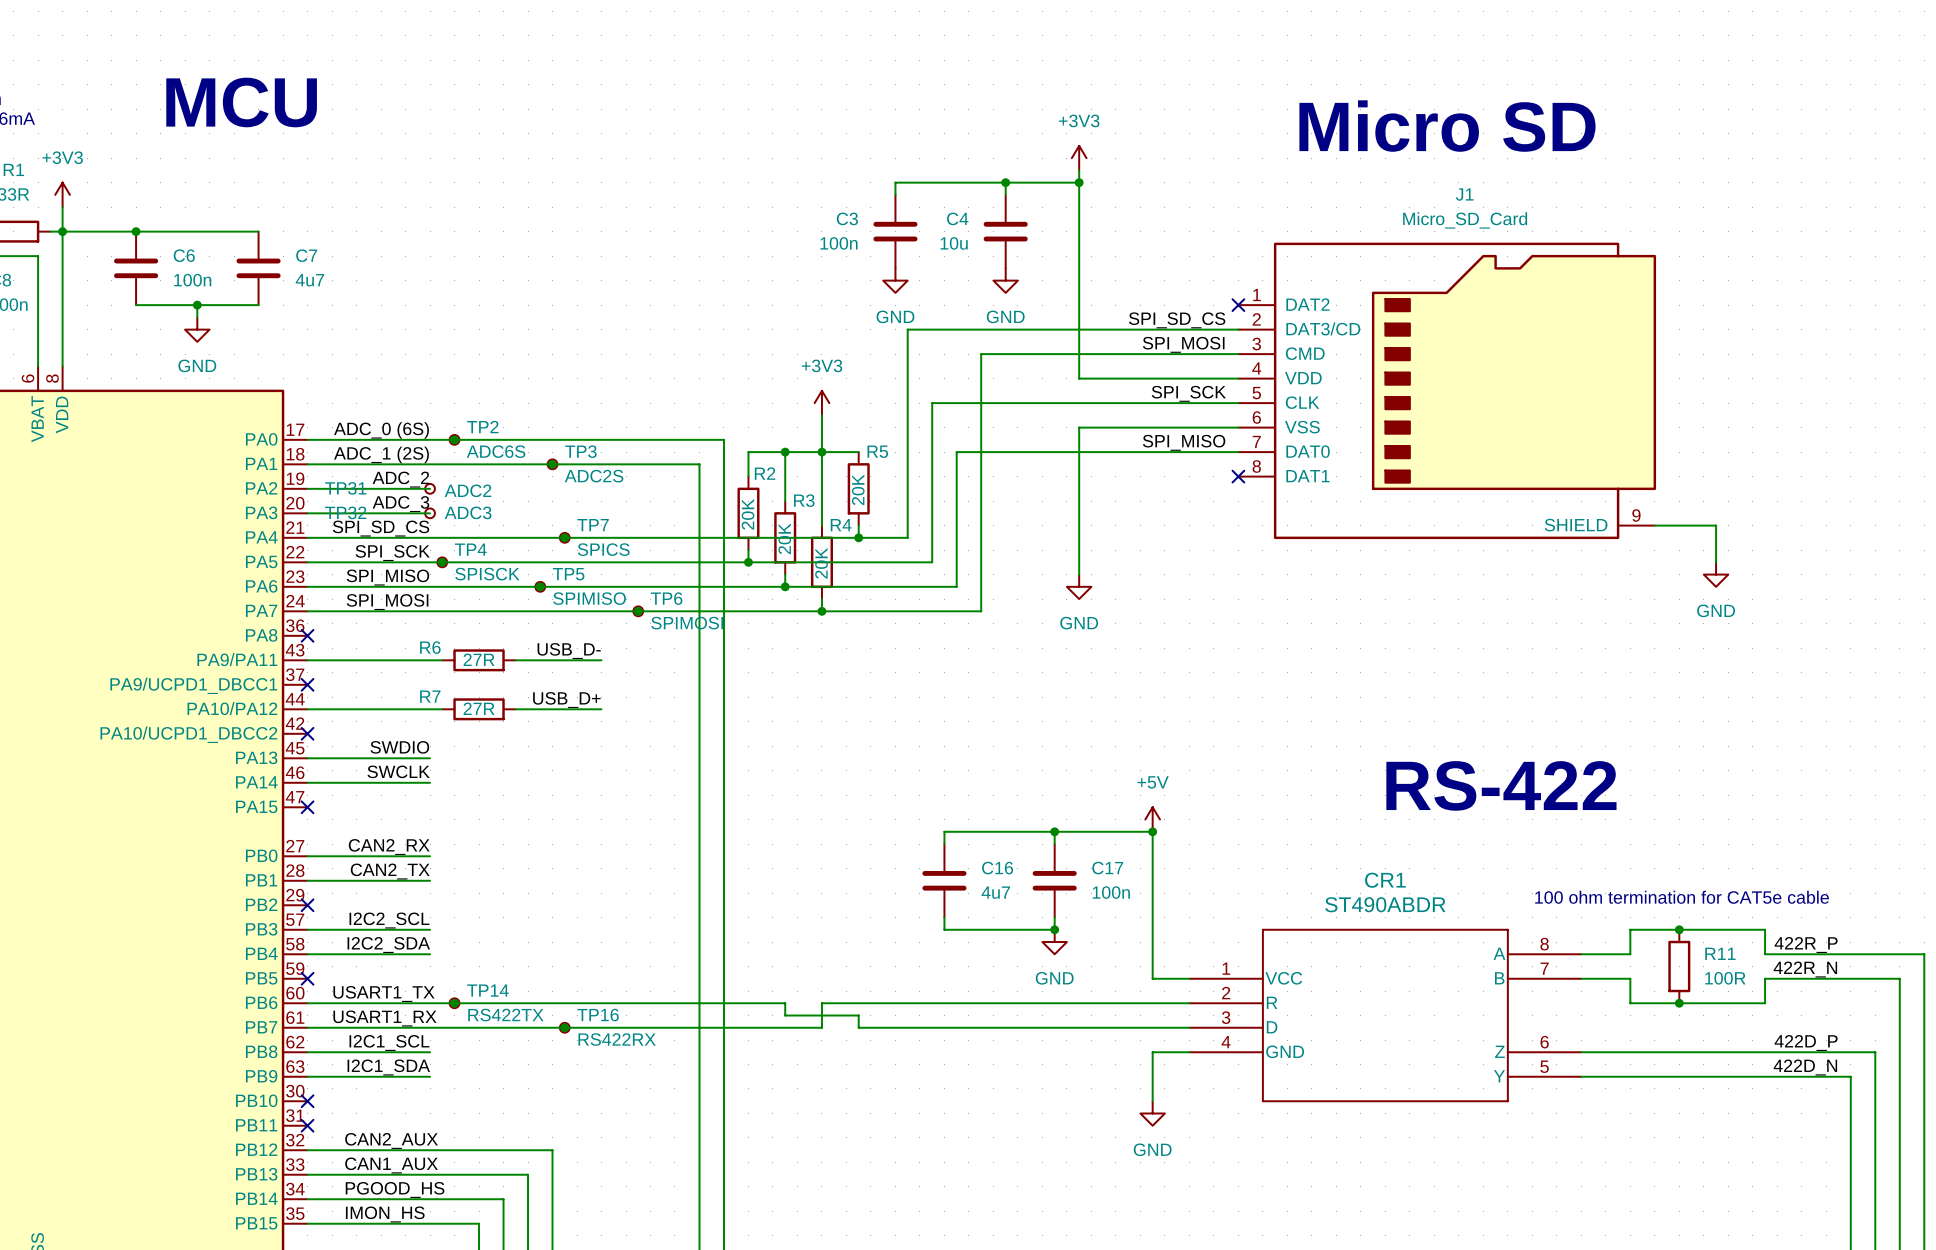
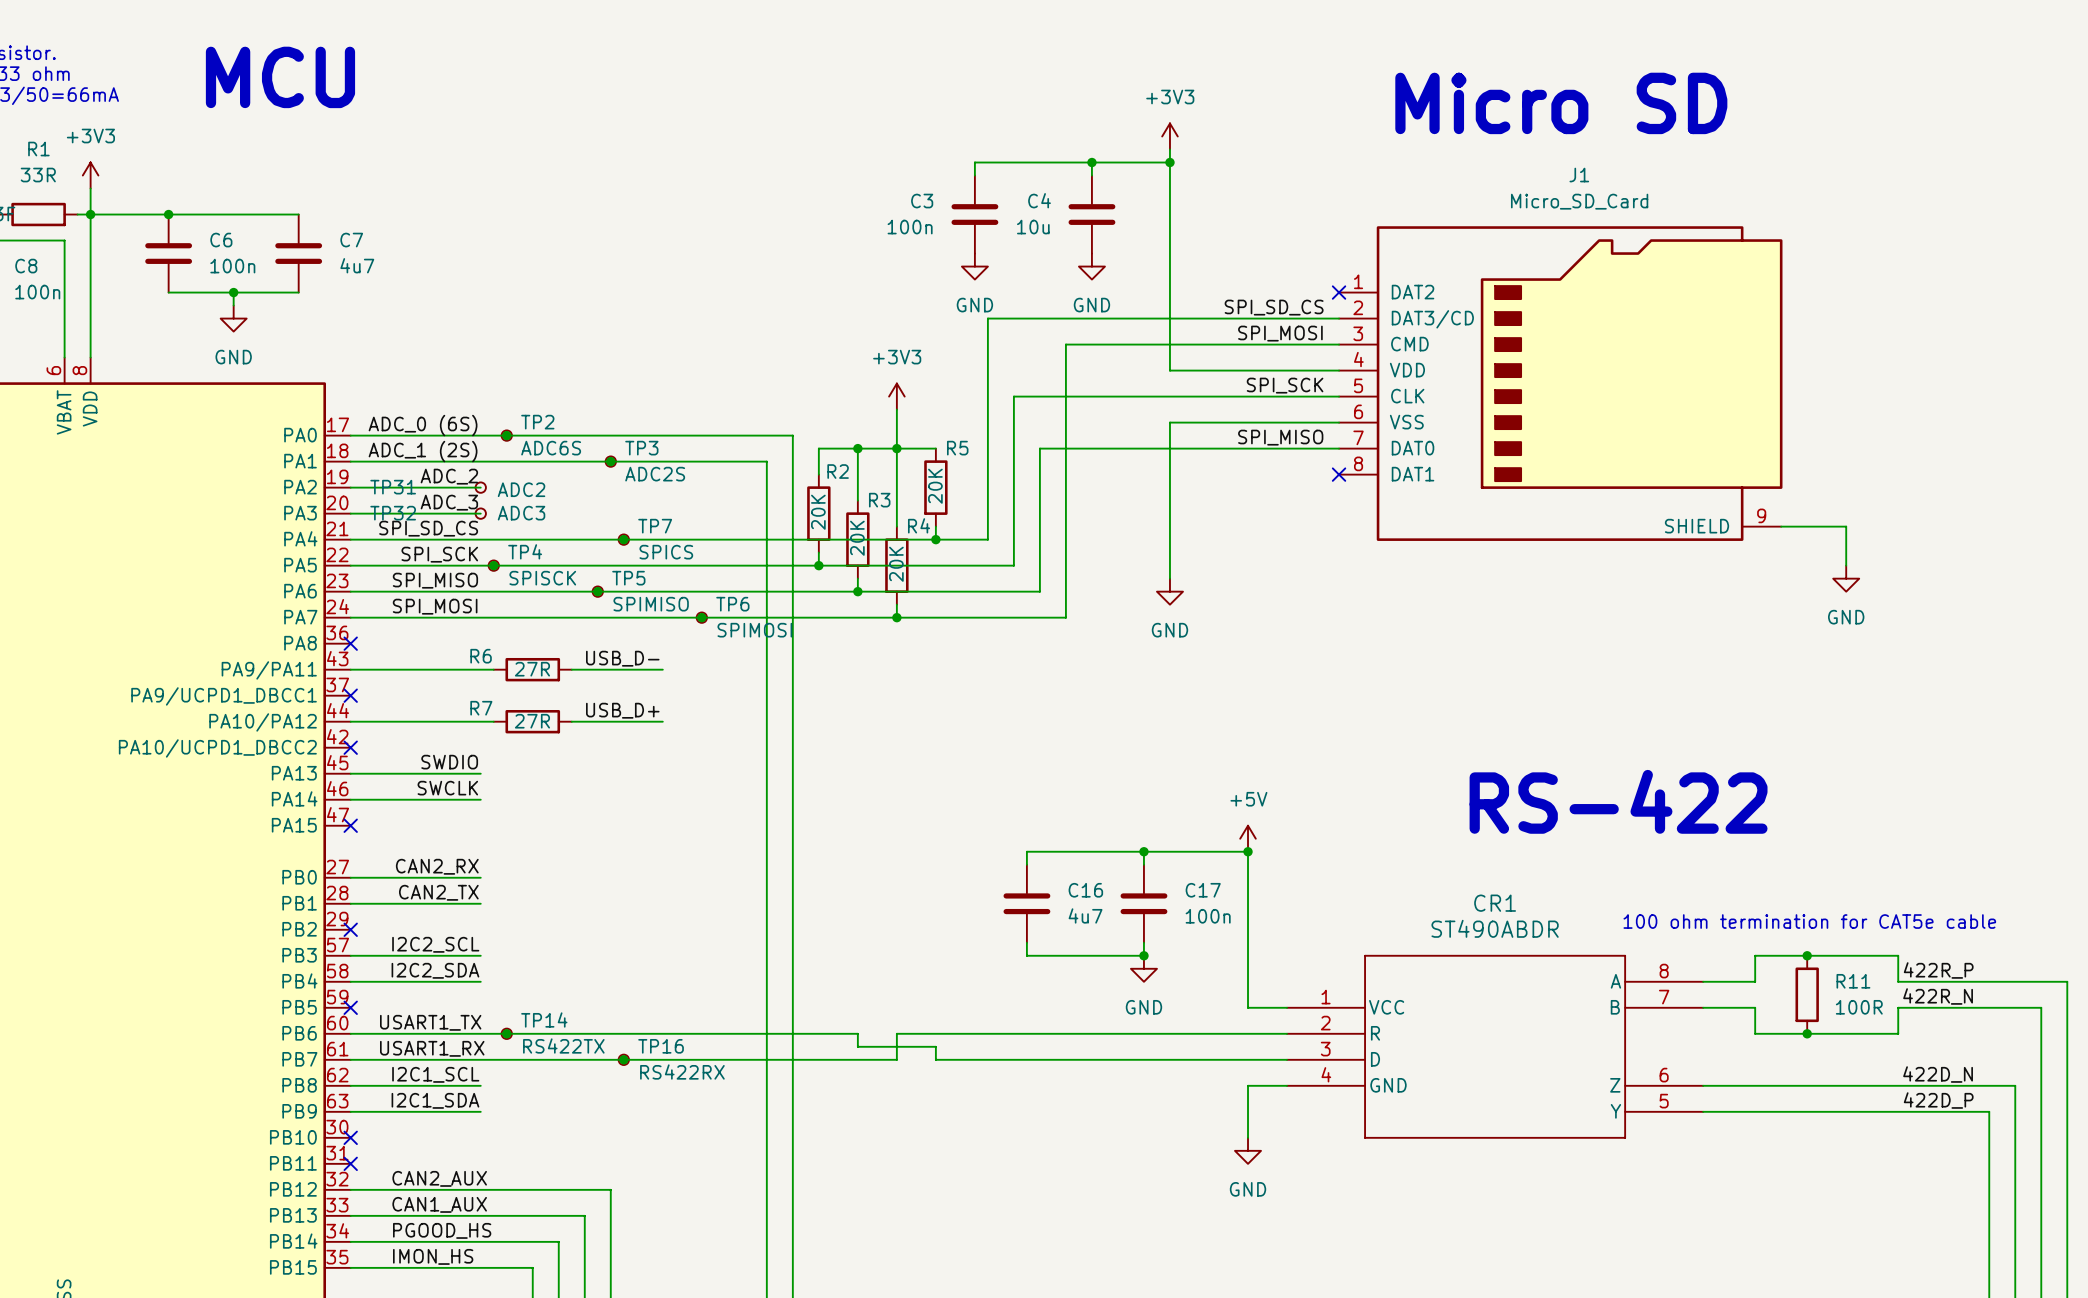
label: 422D_P (1806, 1043) -> 422D_N (1938, 1074)
label: 422D_N (1805, 1067) -> 422D_P (1938, 1100)

